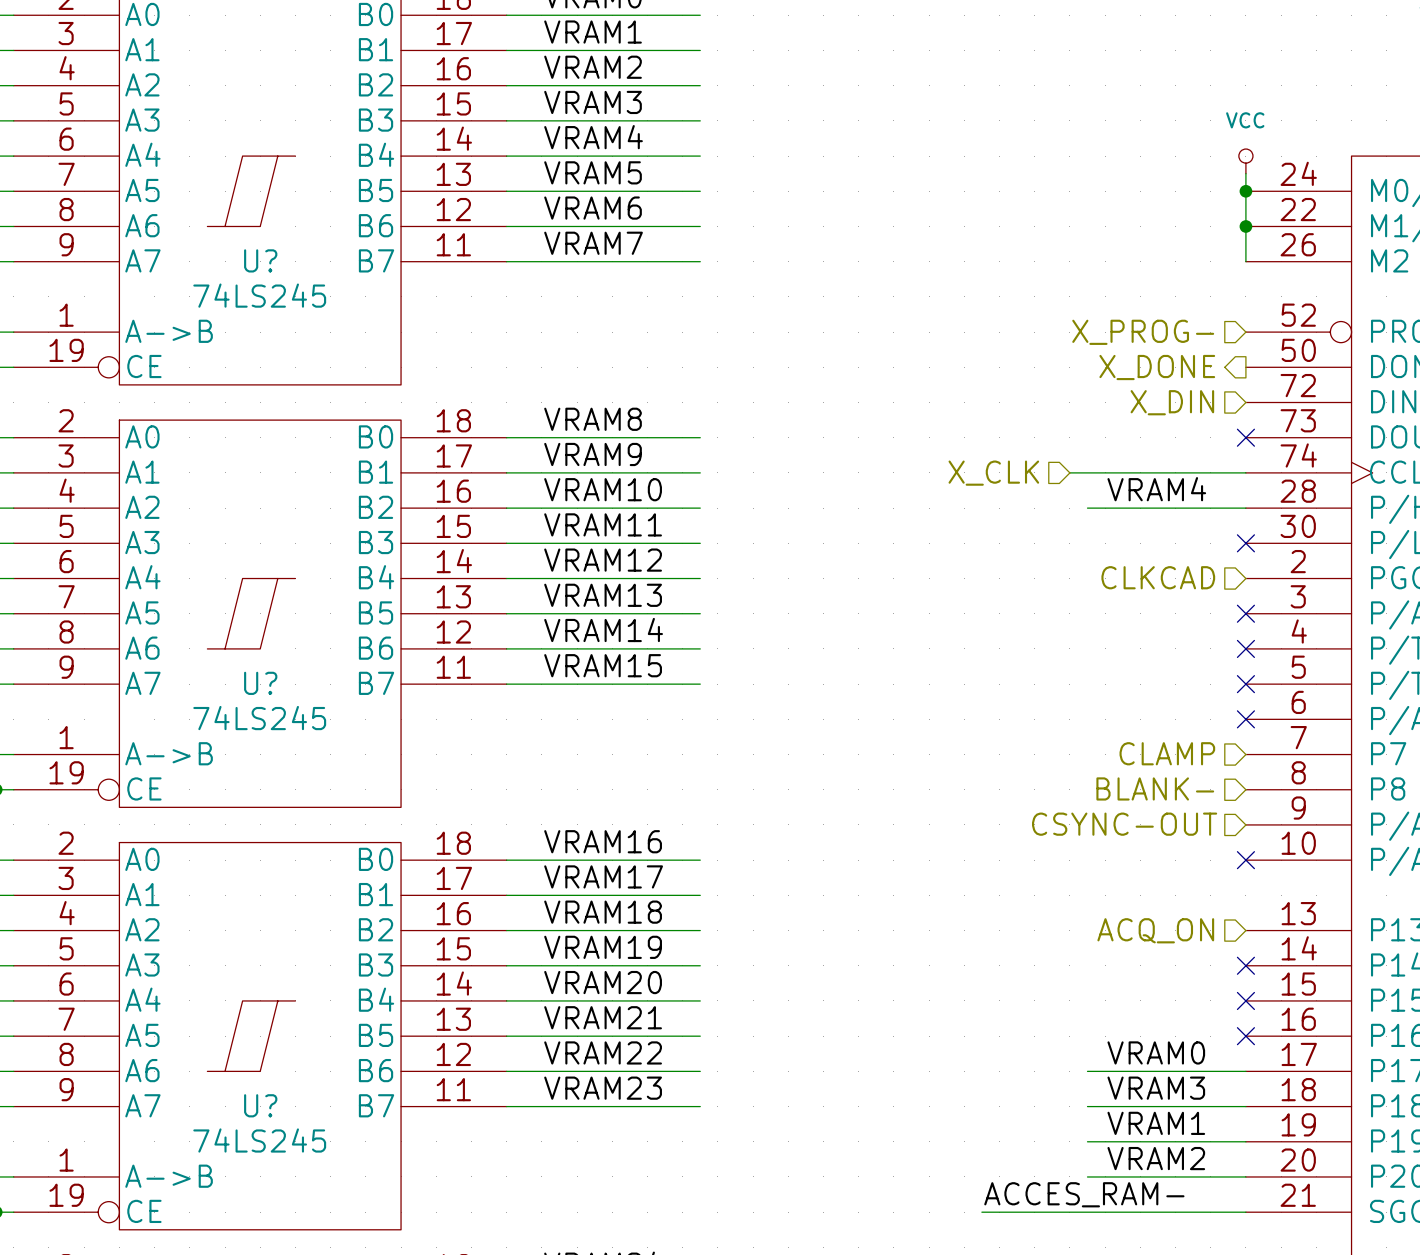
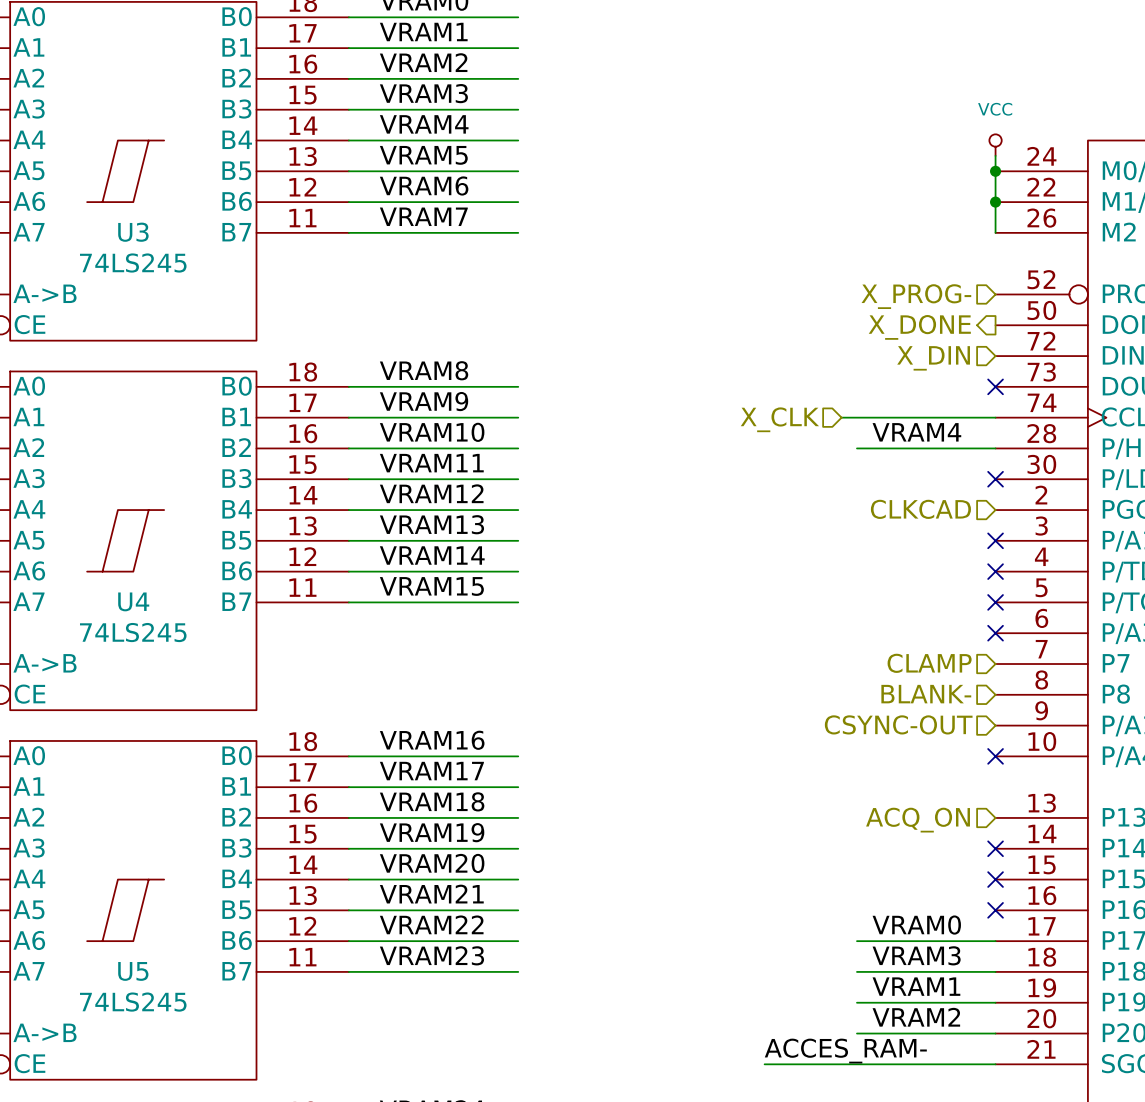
U? name: U? (260, 260) -> U3 (133, 232)
U? name: U? (260, 683) -> U4 (133, 601)
U? name: U? (260, 1105) -> U5 (133, 971)

